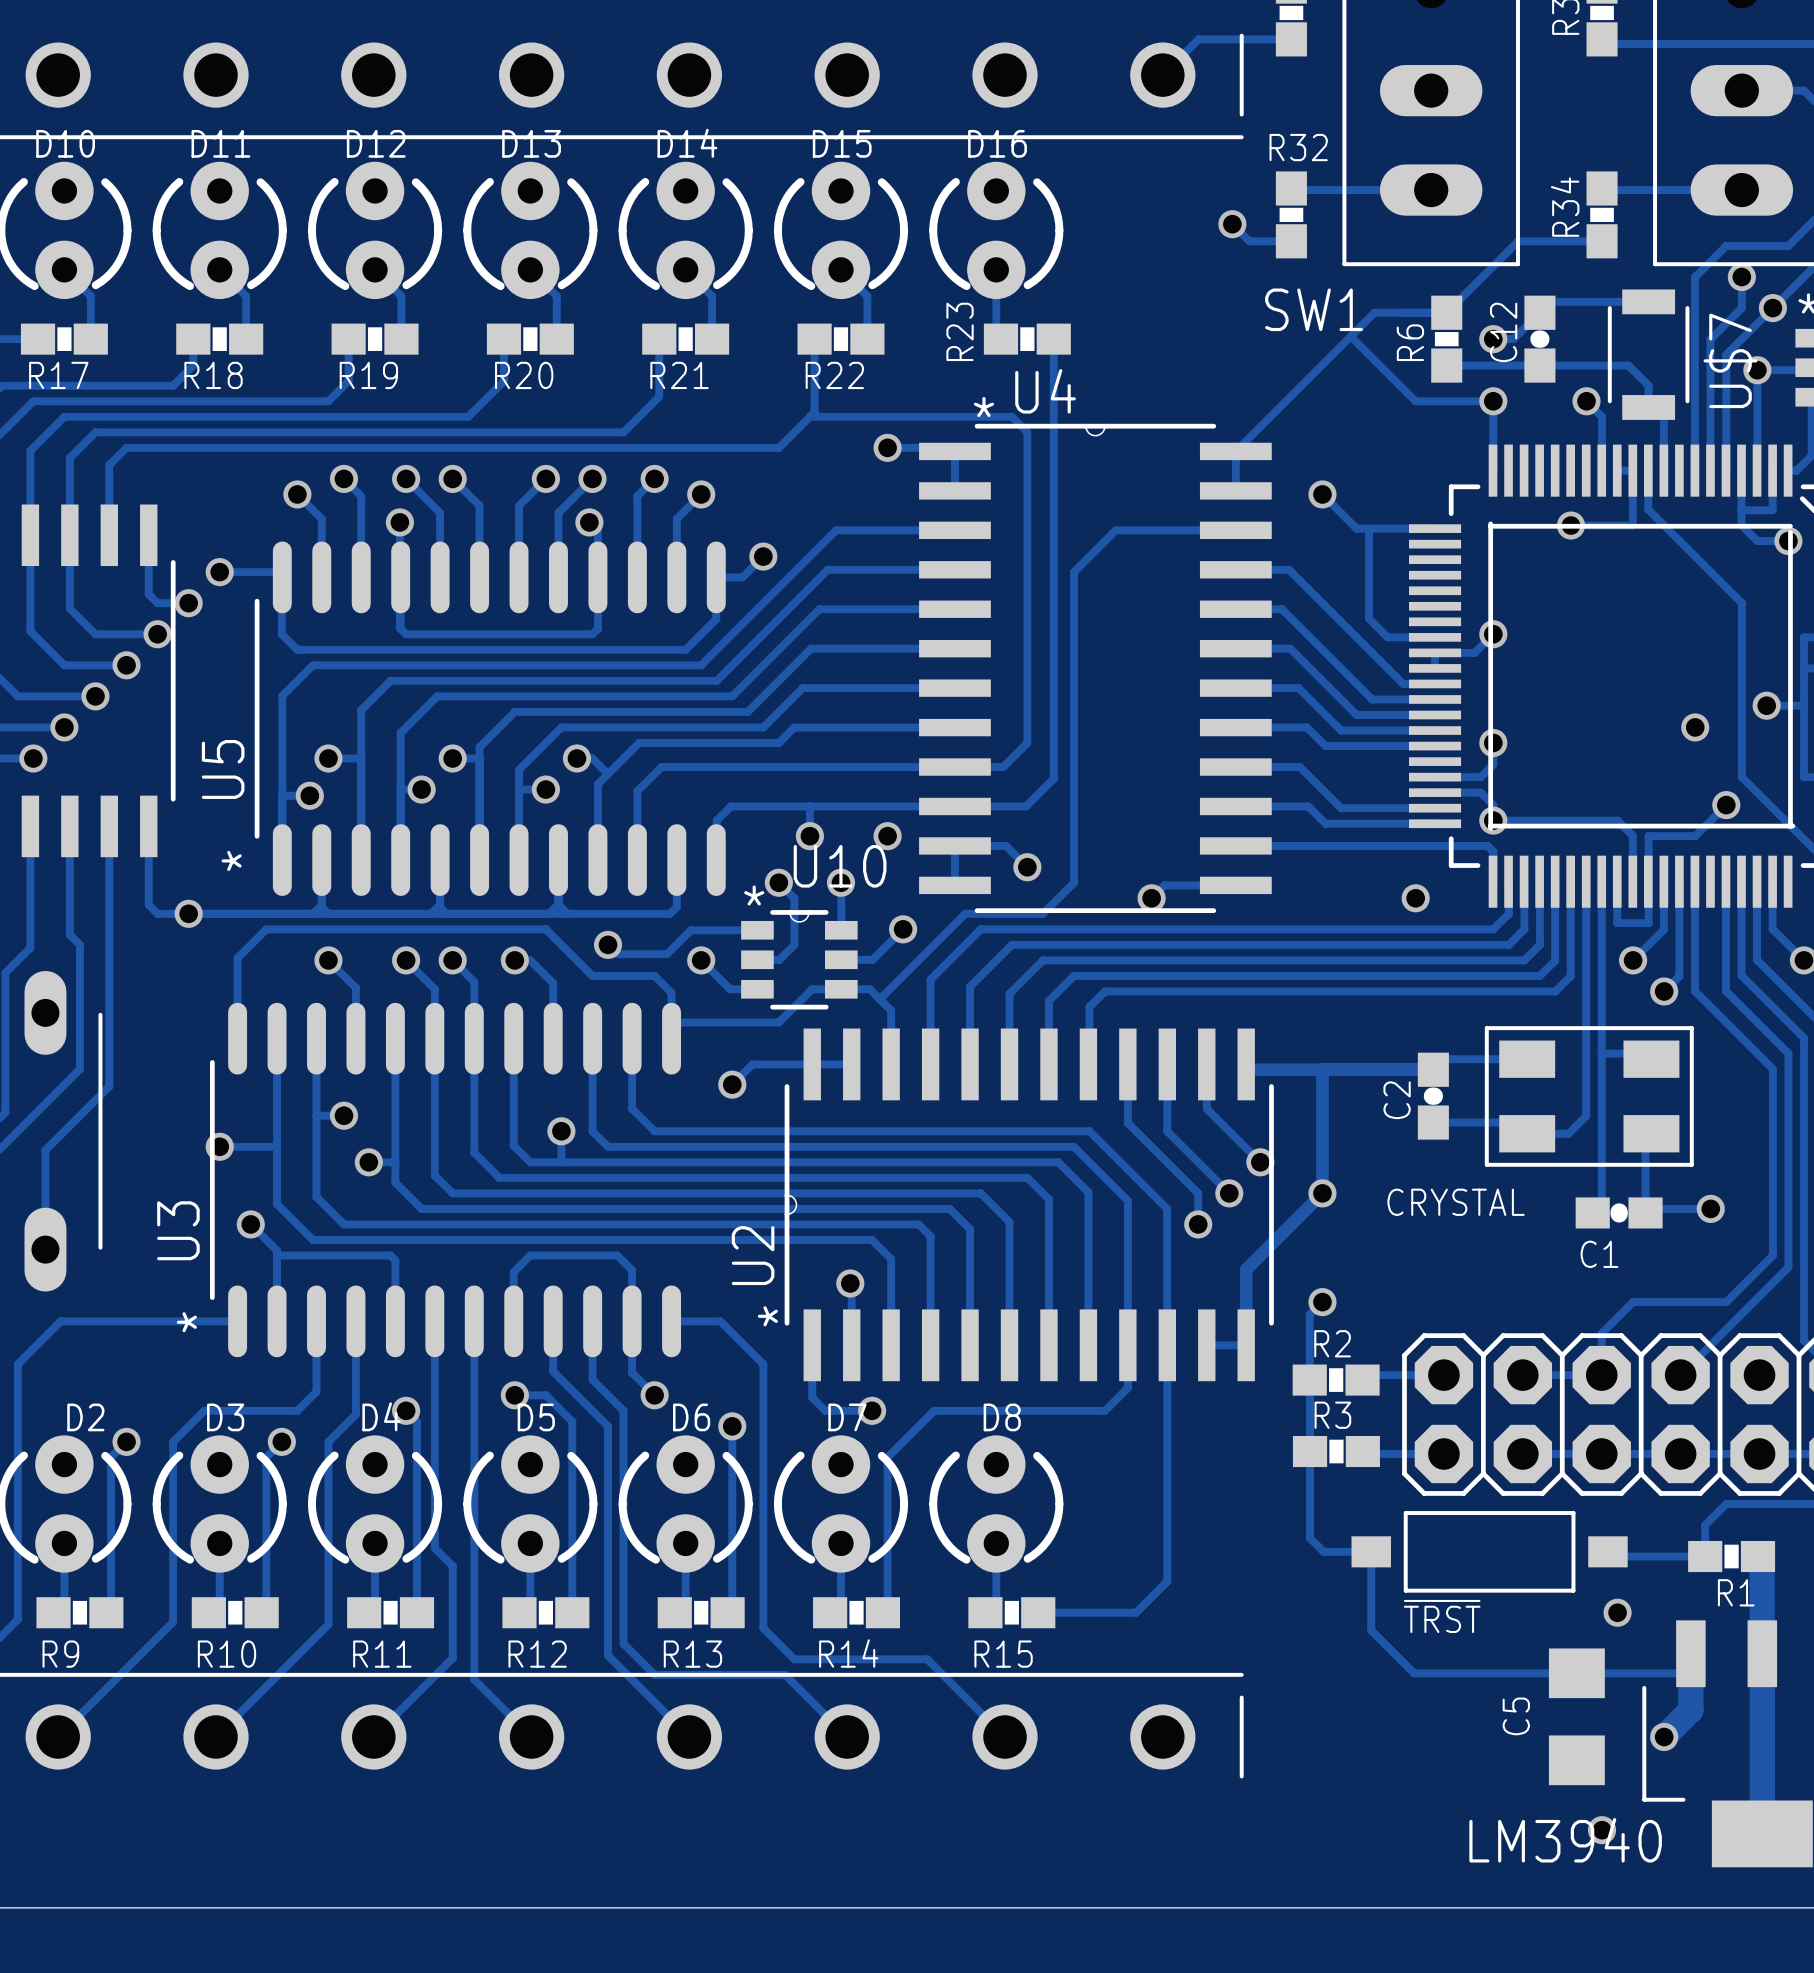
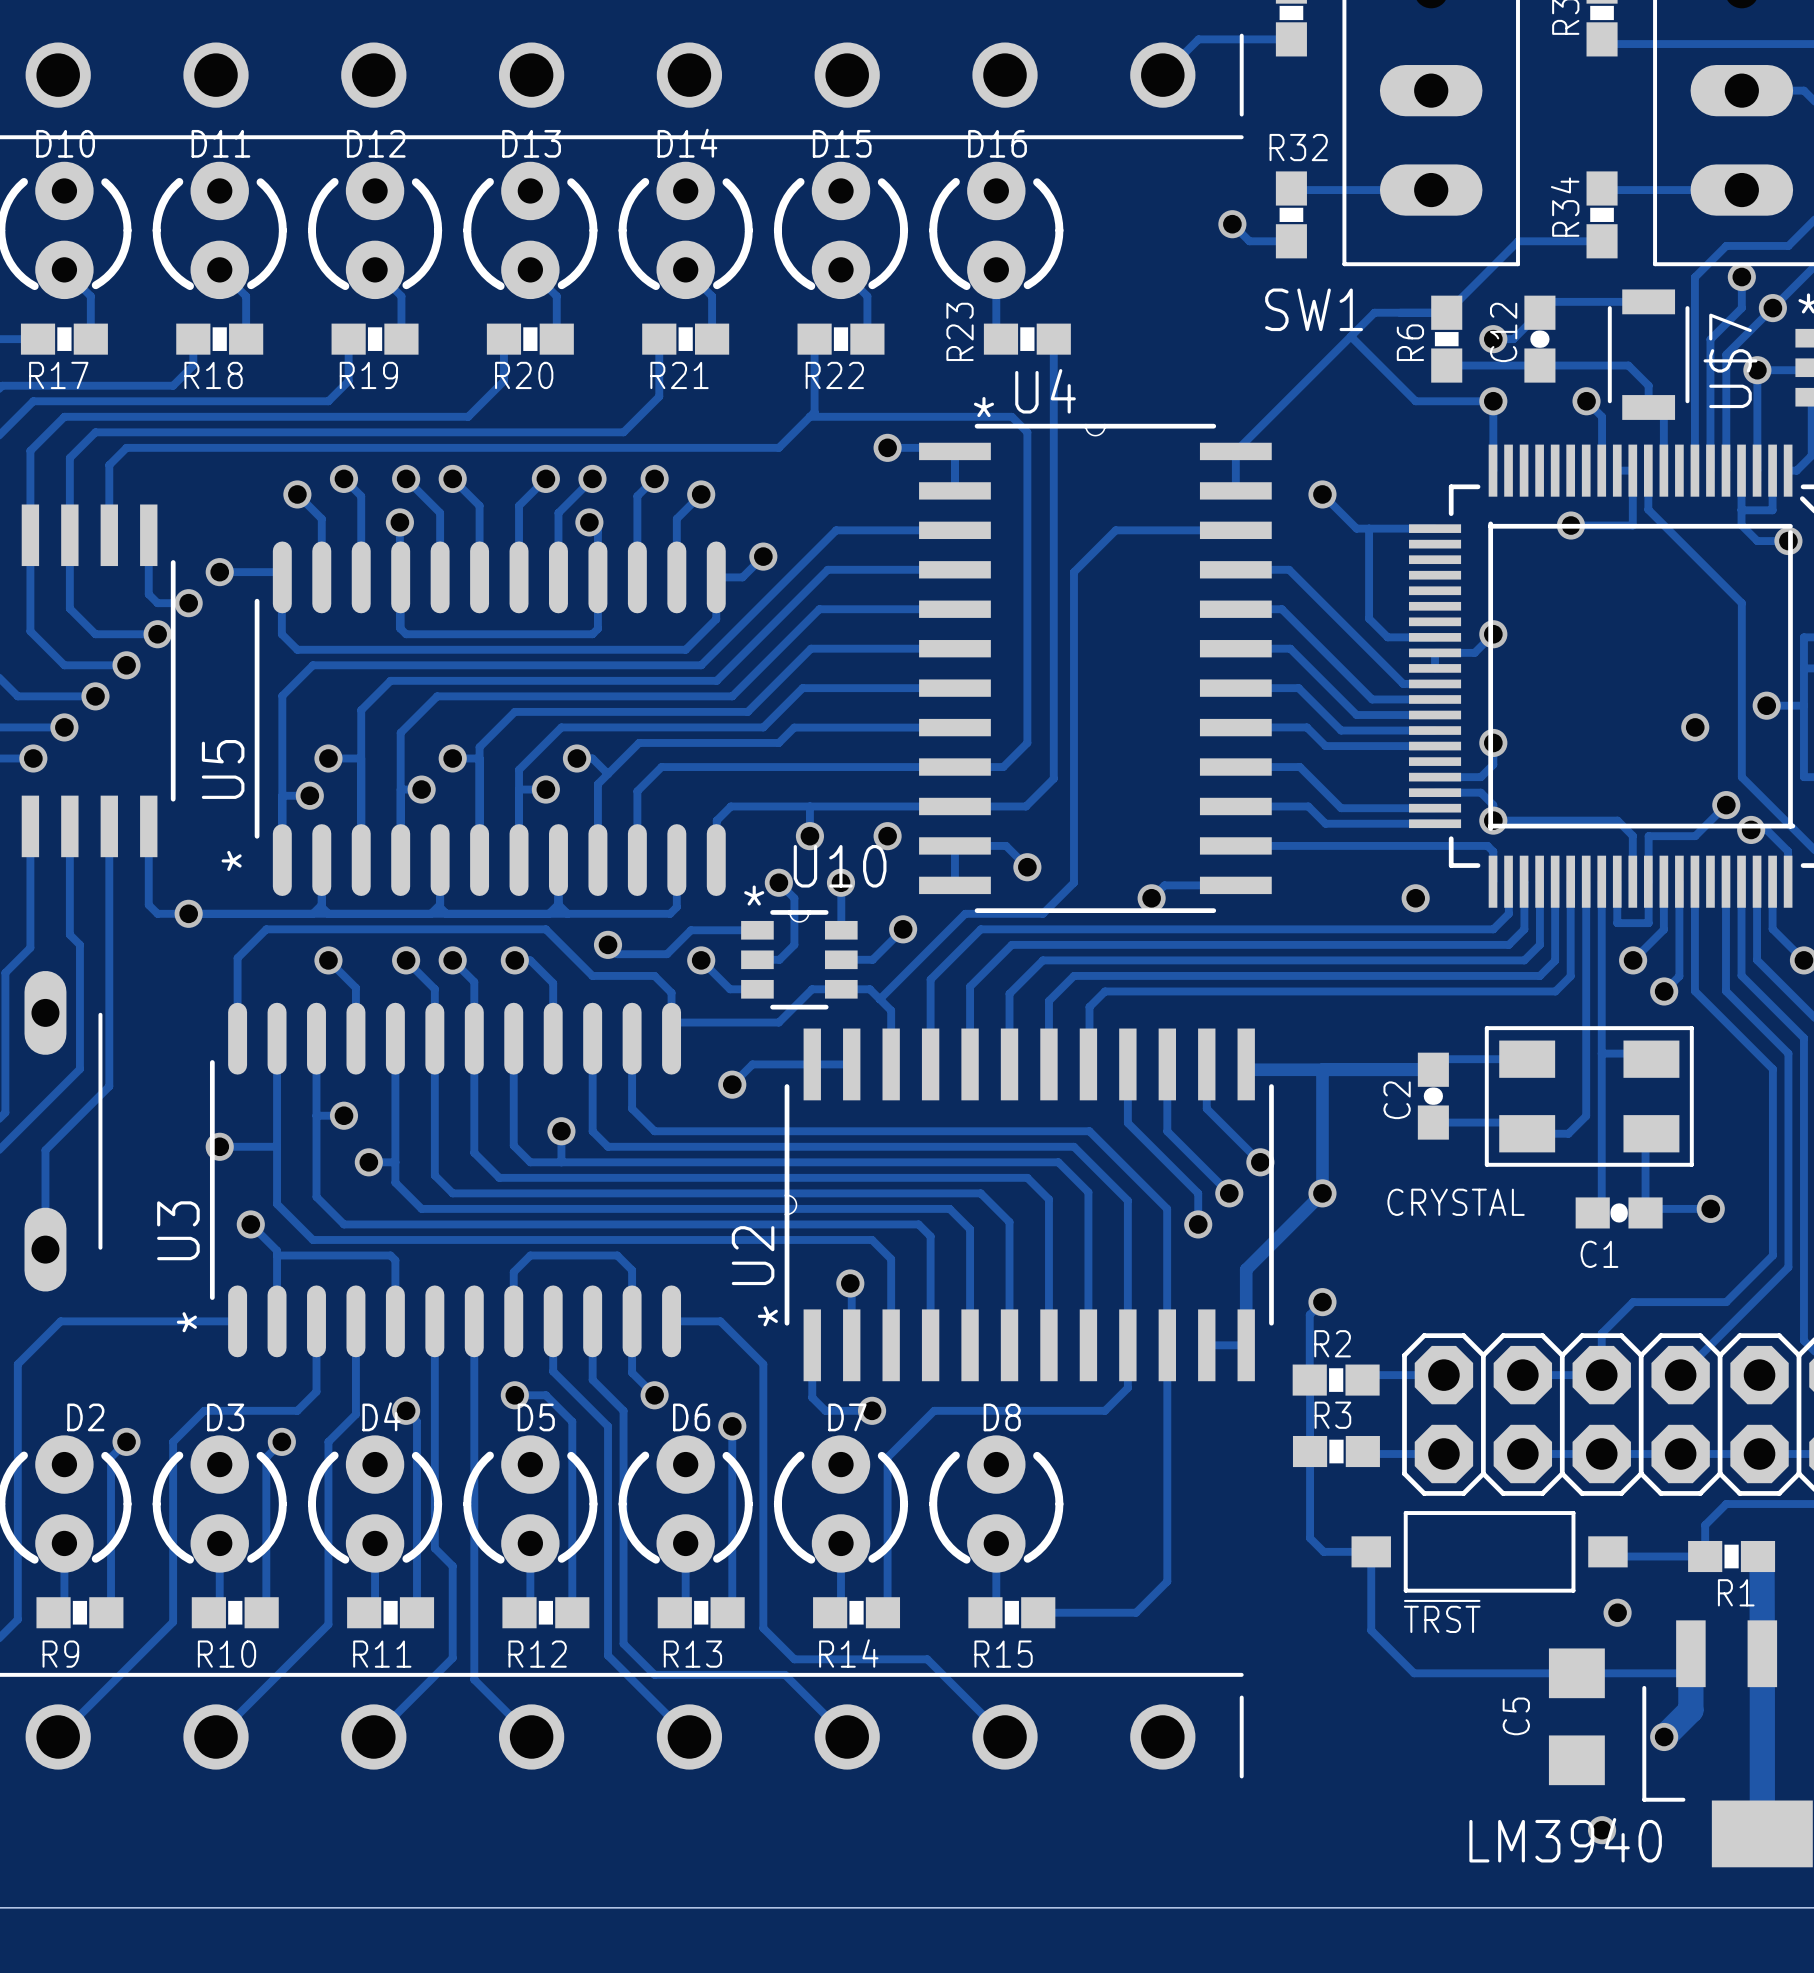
track: none -> (1751, 829) (1766, 829) (1788, 851) (1788, 881)
via: none -> (1751, 829)

